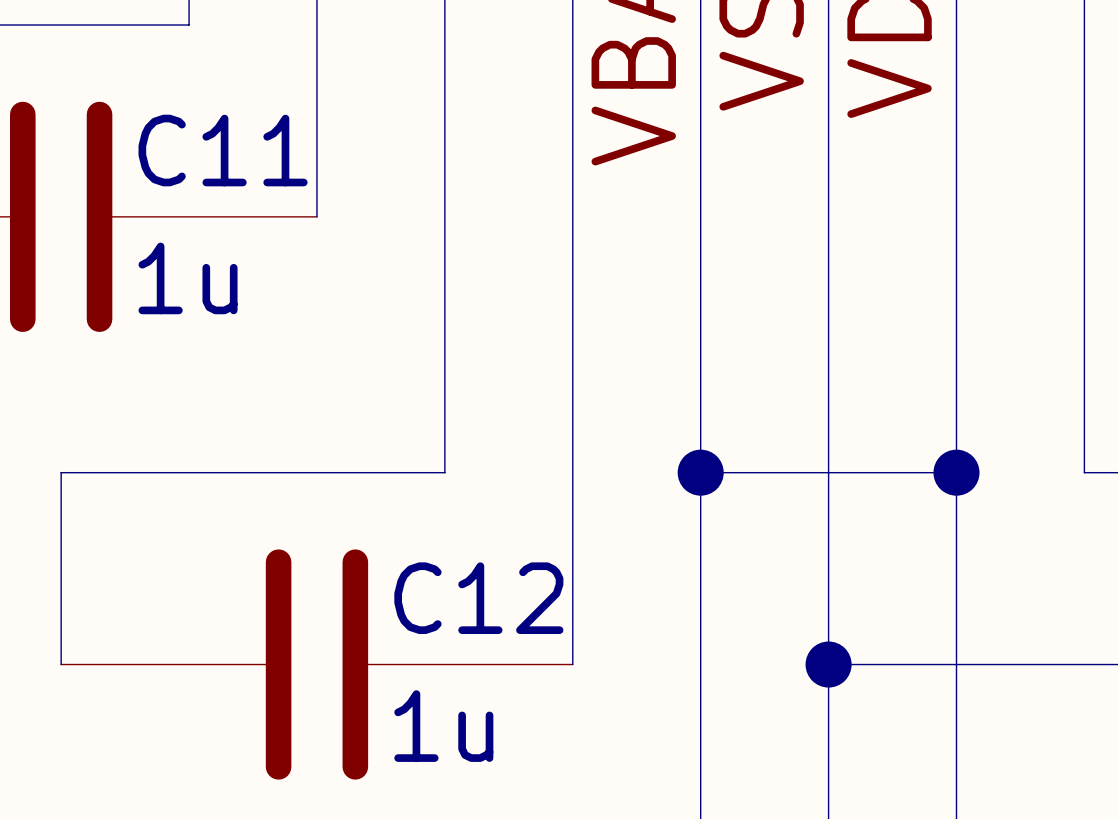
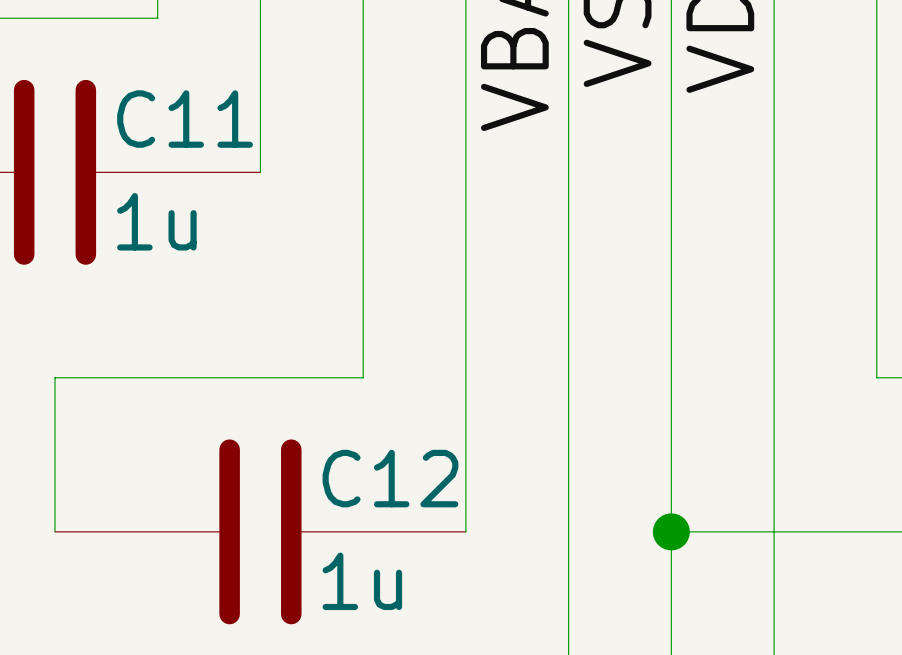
wire: (700, 472) (956, 472) -> none
junction: (700, 472) -> none
junction: (956, 472) -> none

